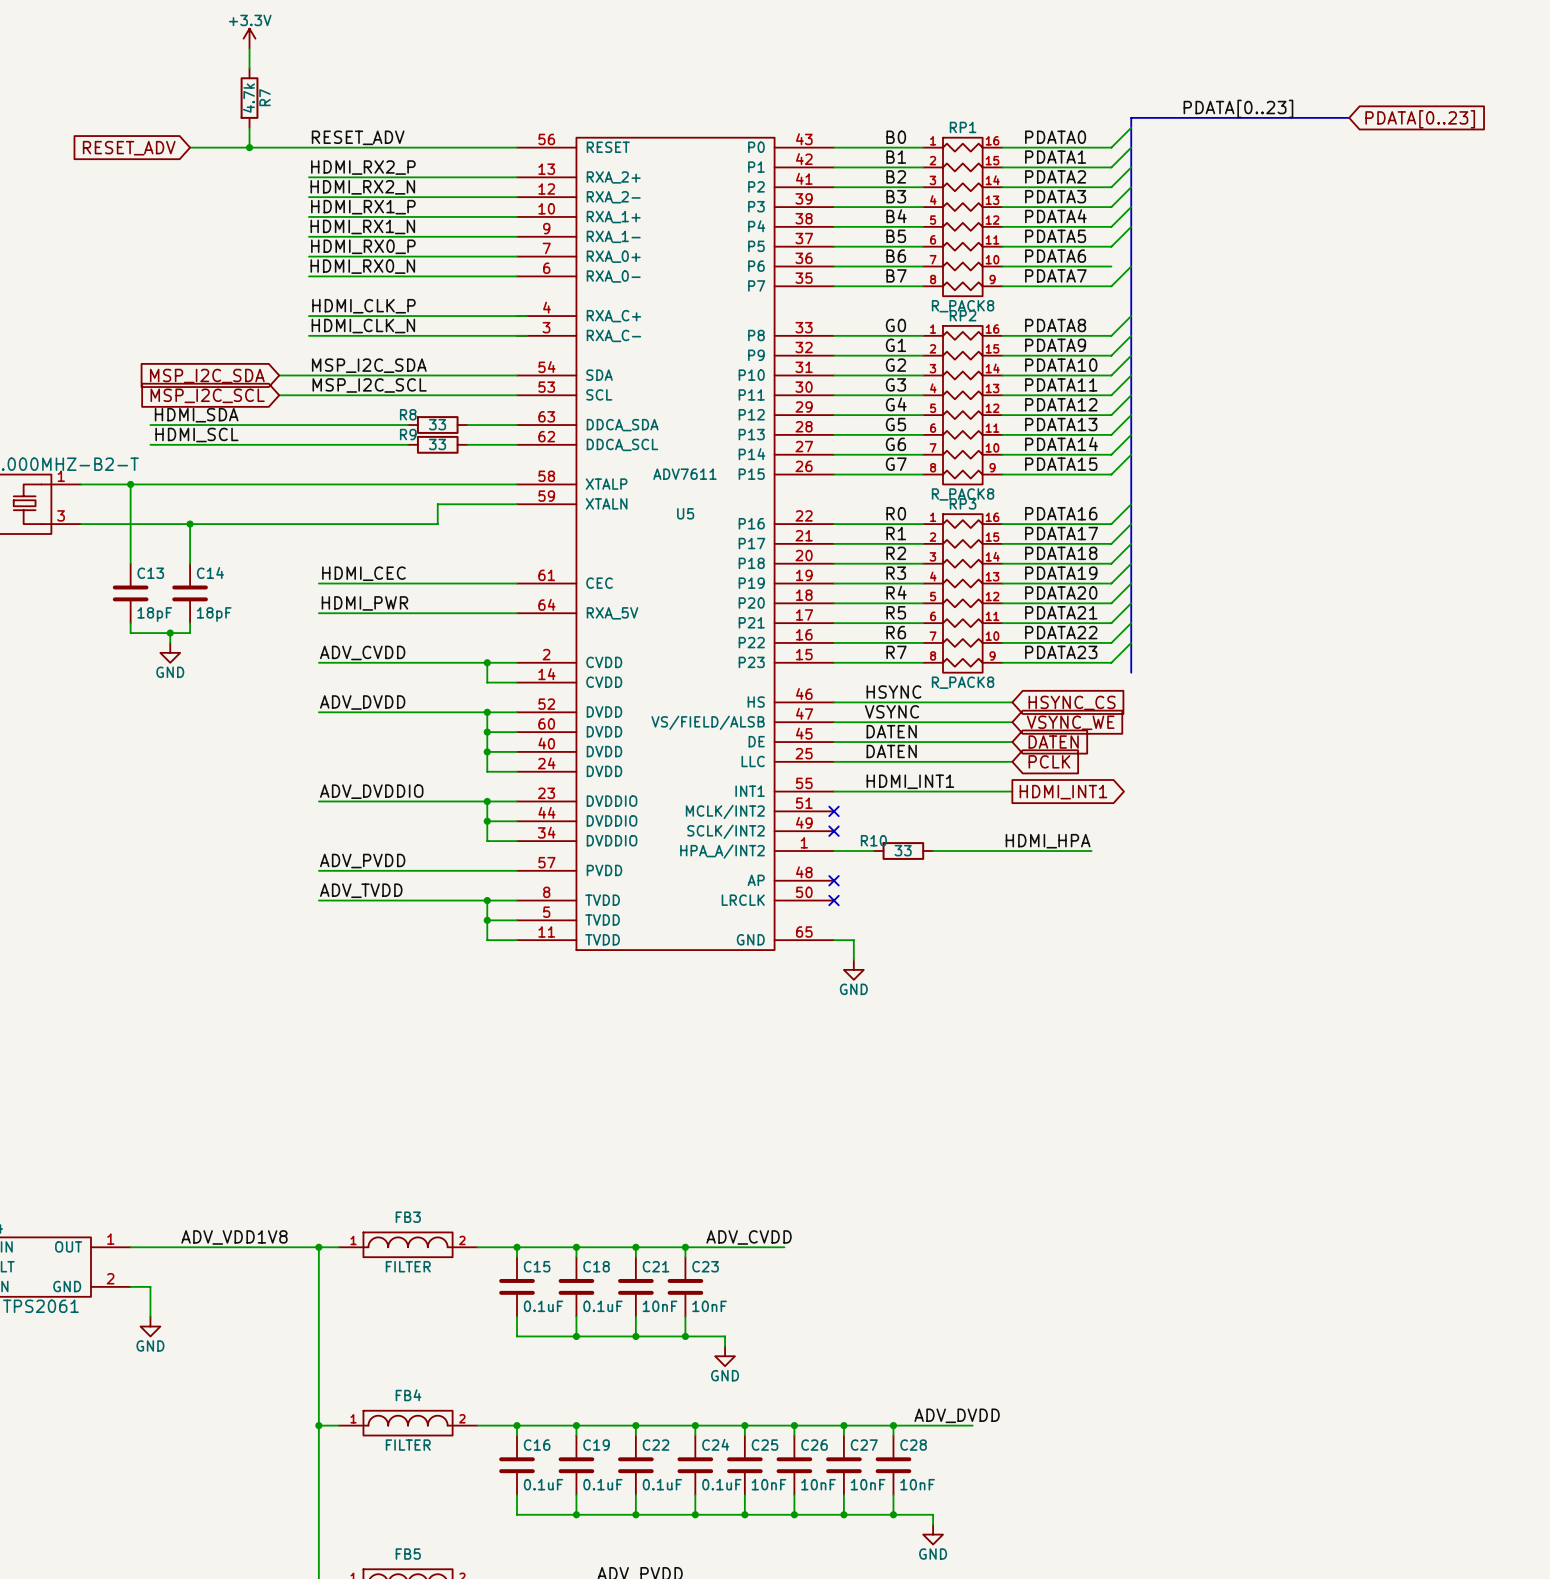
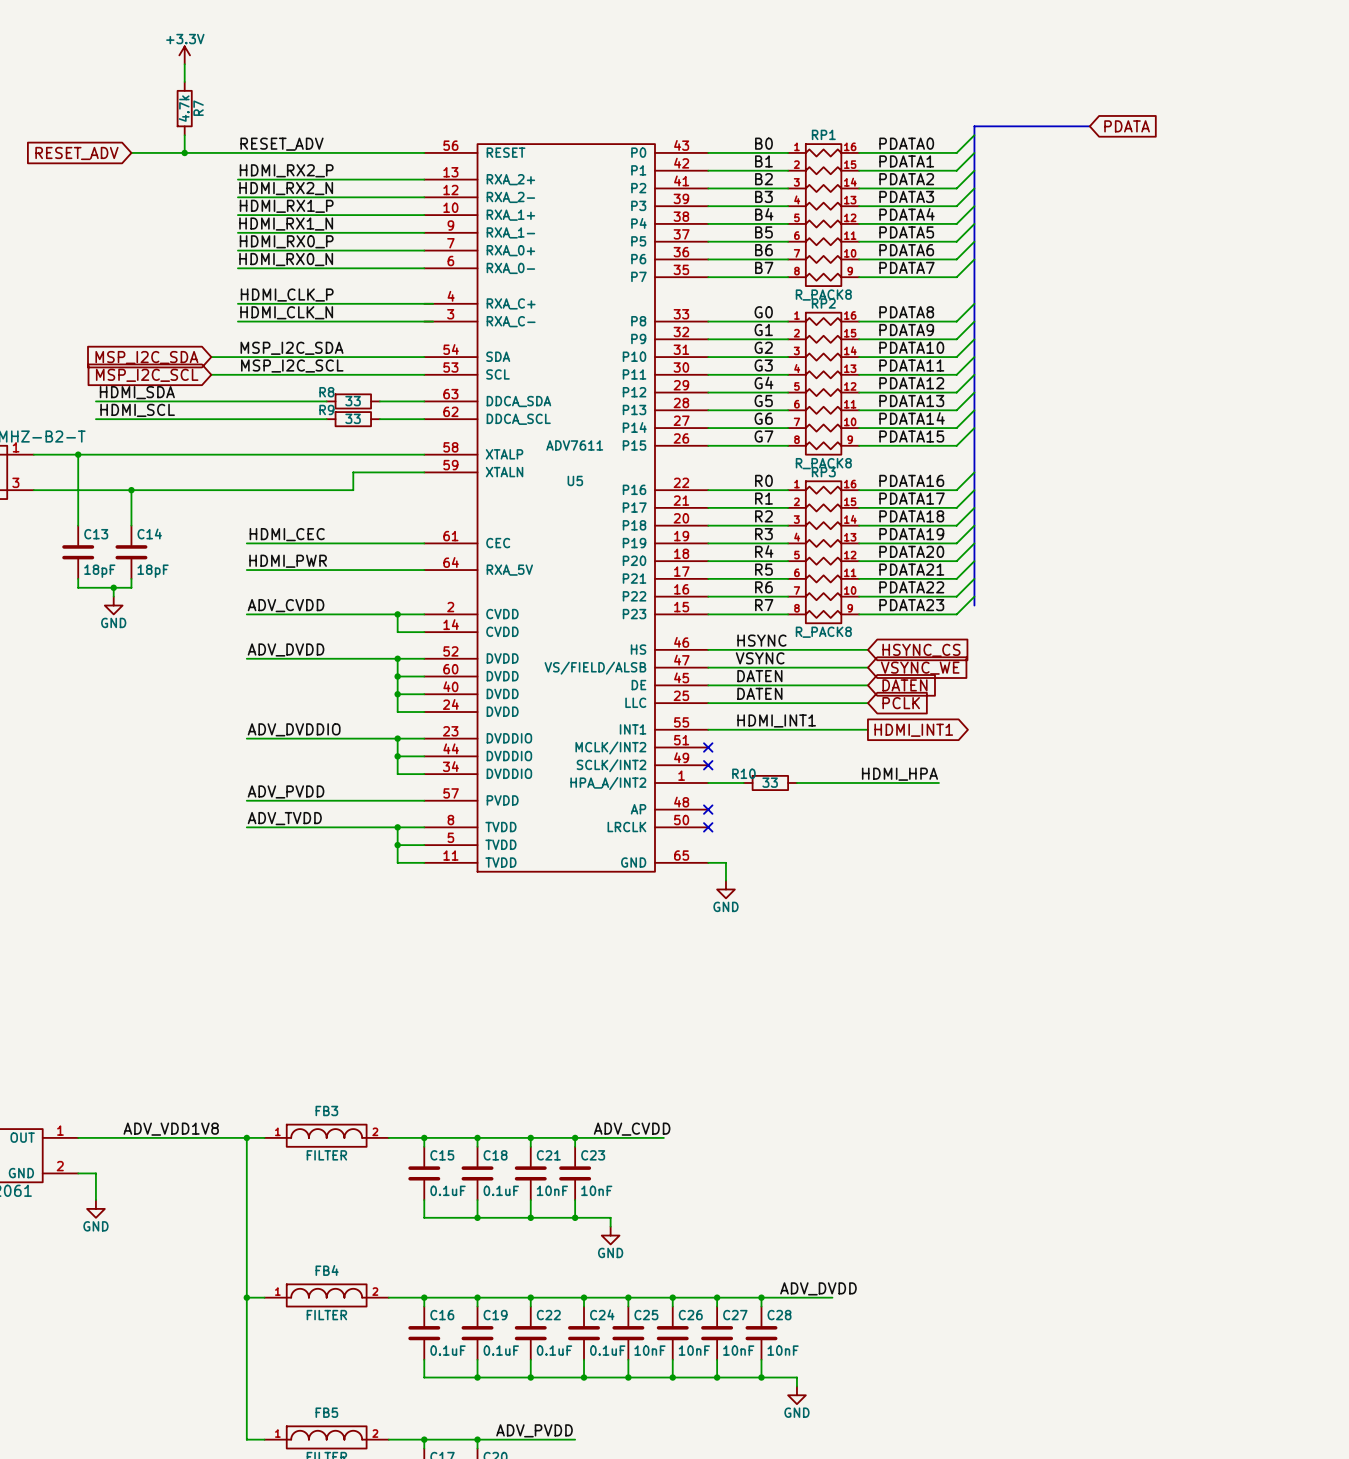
label: PDATA[0..23] (1238, 108) -> none
bus: (1260, 117) (1349, 117) -> none
global label: none -> PDATA (1127, 126)
global label: PDATA[0..23] (1420, 119) -> none
wire: none -> (974, 241) (956, 259)
bus: (1131, 652) (1131, 672) -> none

